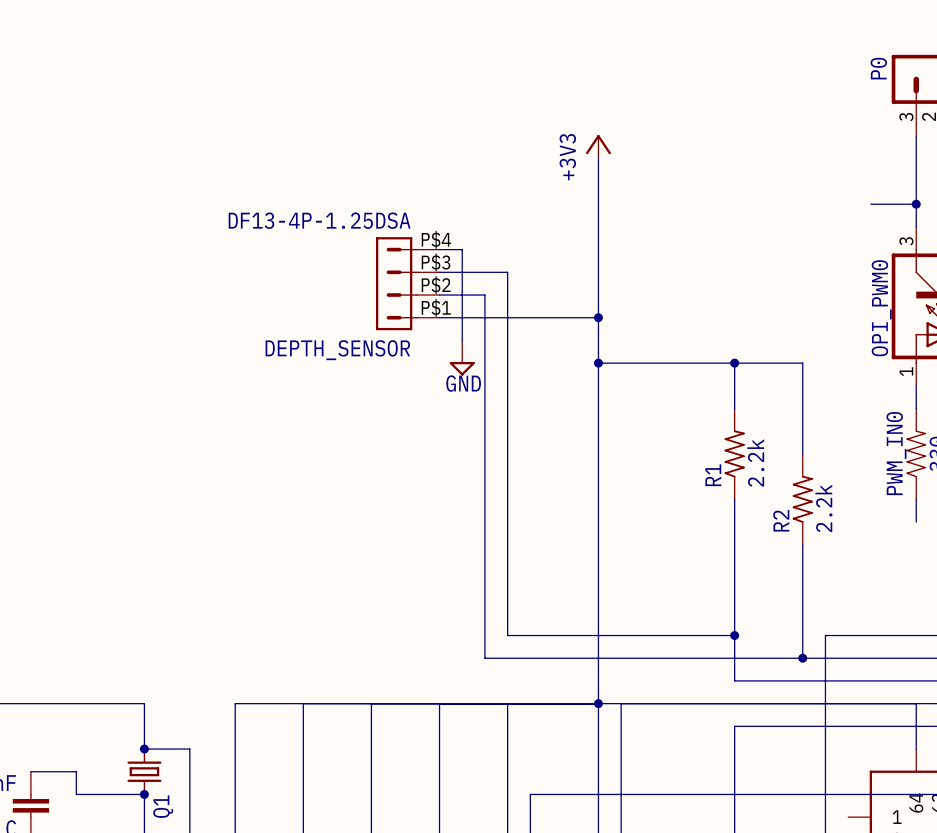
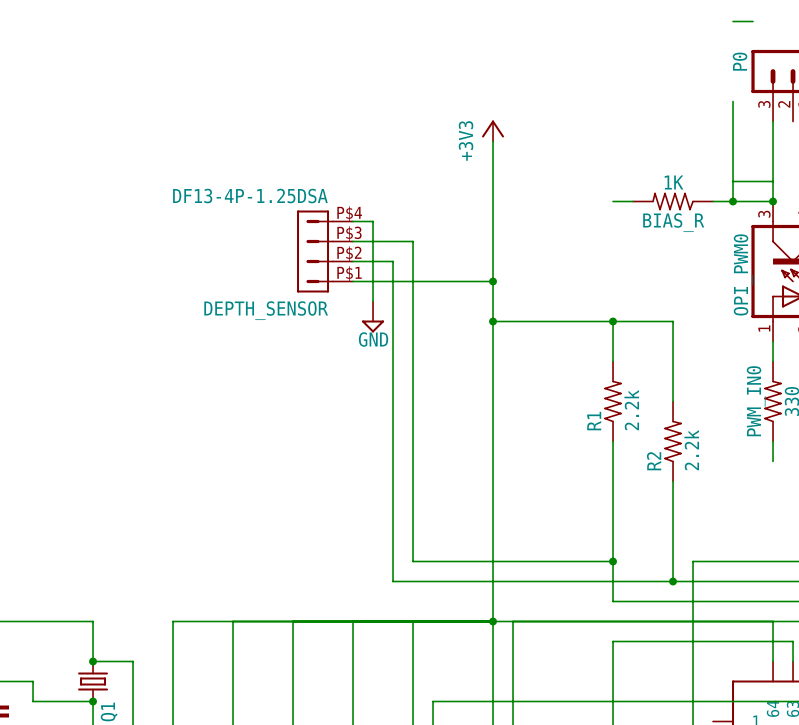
wire: none -> (733, 21) (753, 21)
wire: none -> (733, 101) (733, 201)
junction position: (916, 204) -> (773, 201)
wire: none -> (613, 201) (633, 201)
BIAS_R: none -> 1K (673, 201)
wire: none -> (713, 201) (773, 201)
junction: none -> (733, 201)

